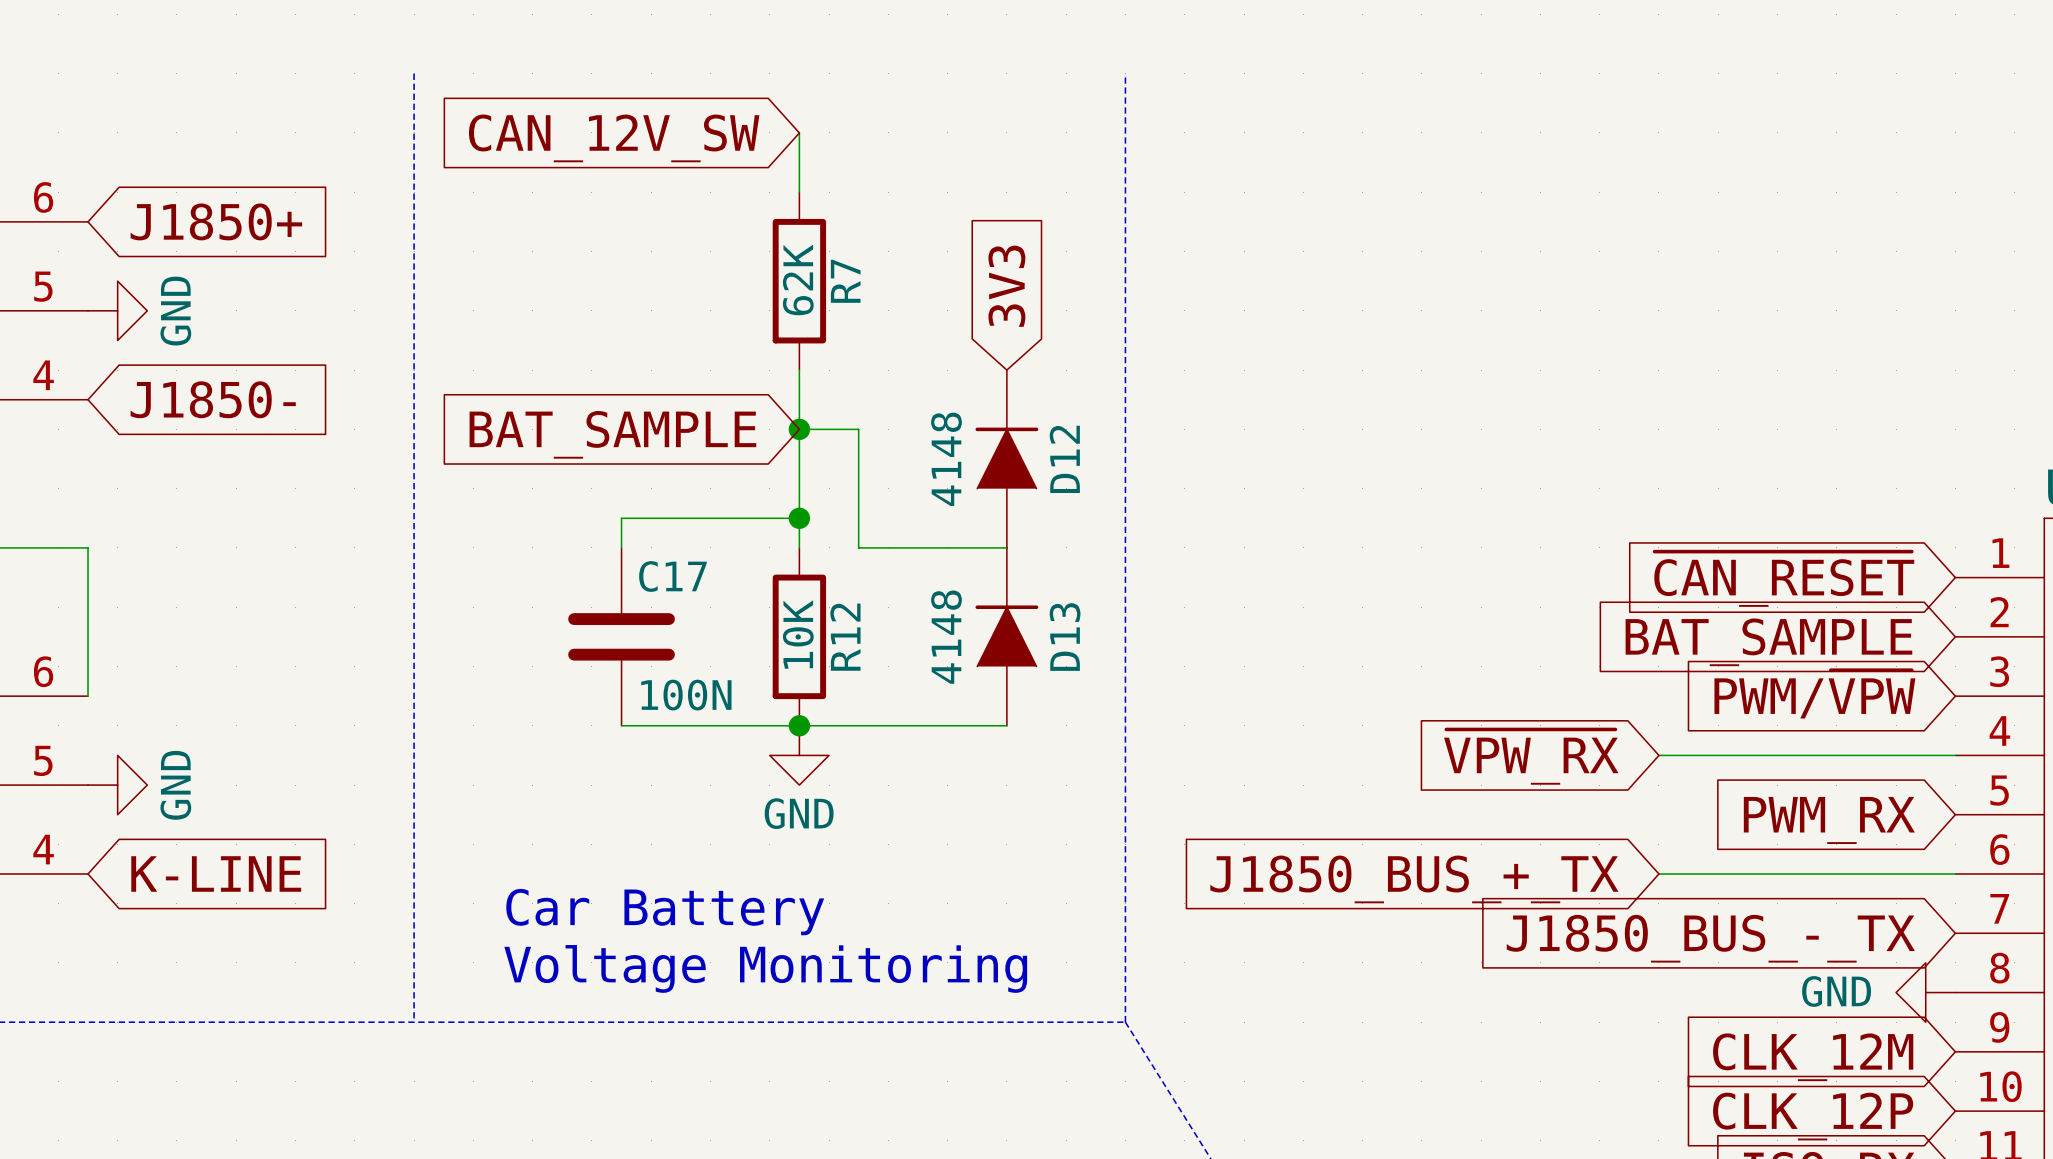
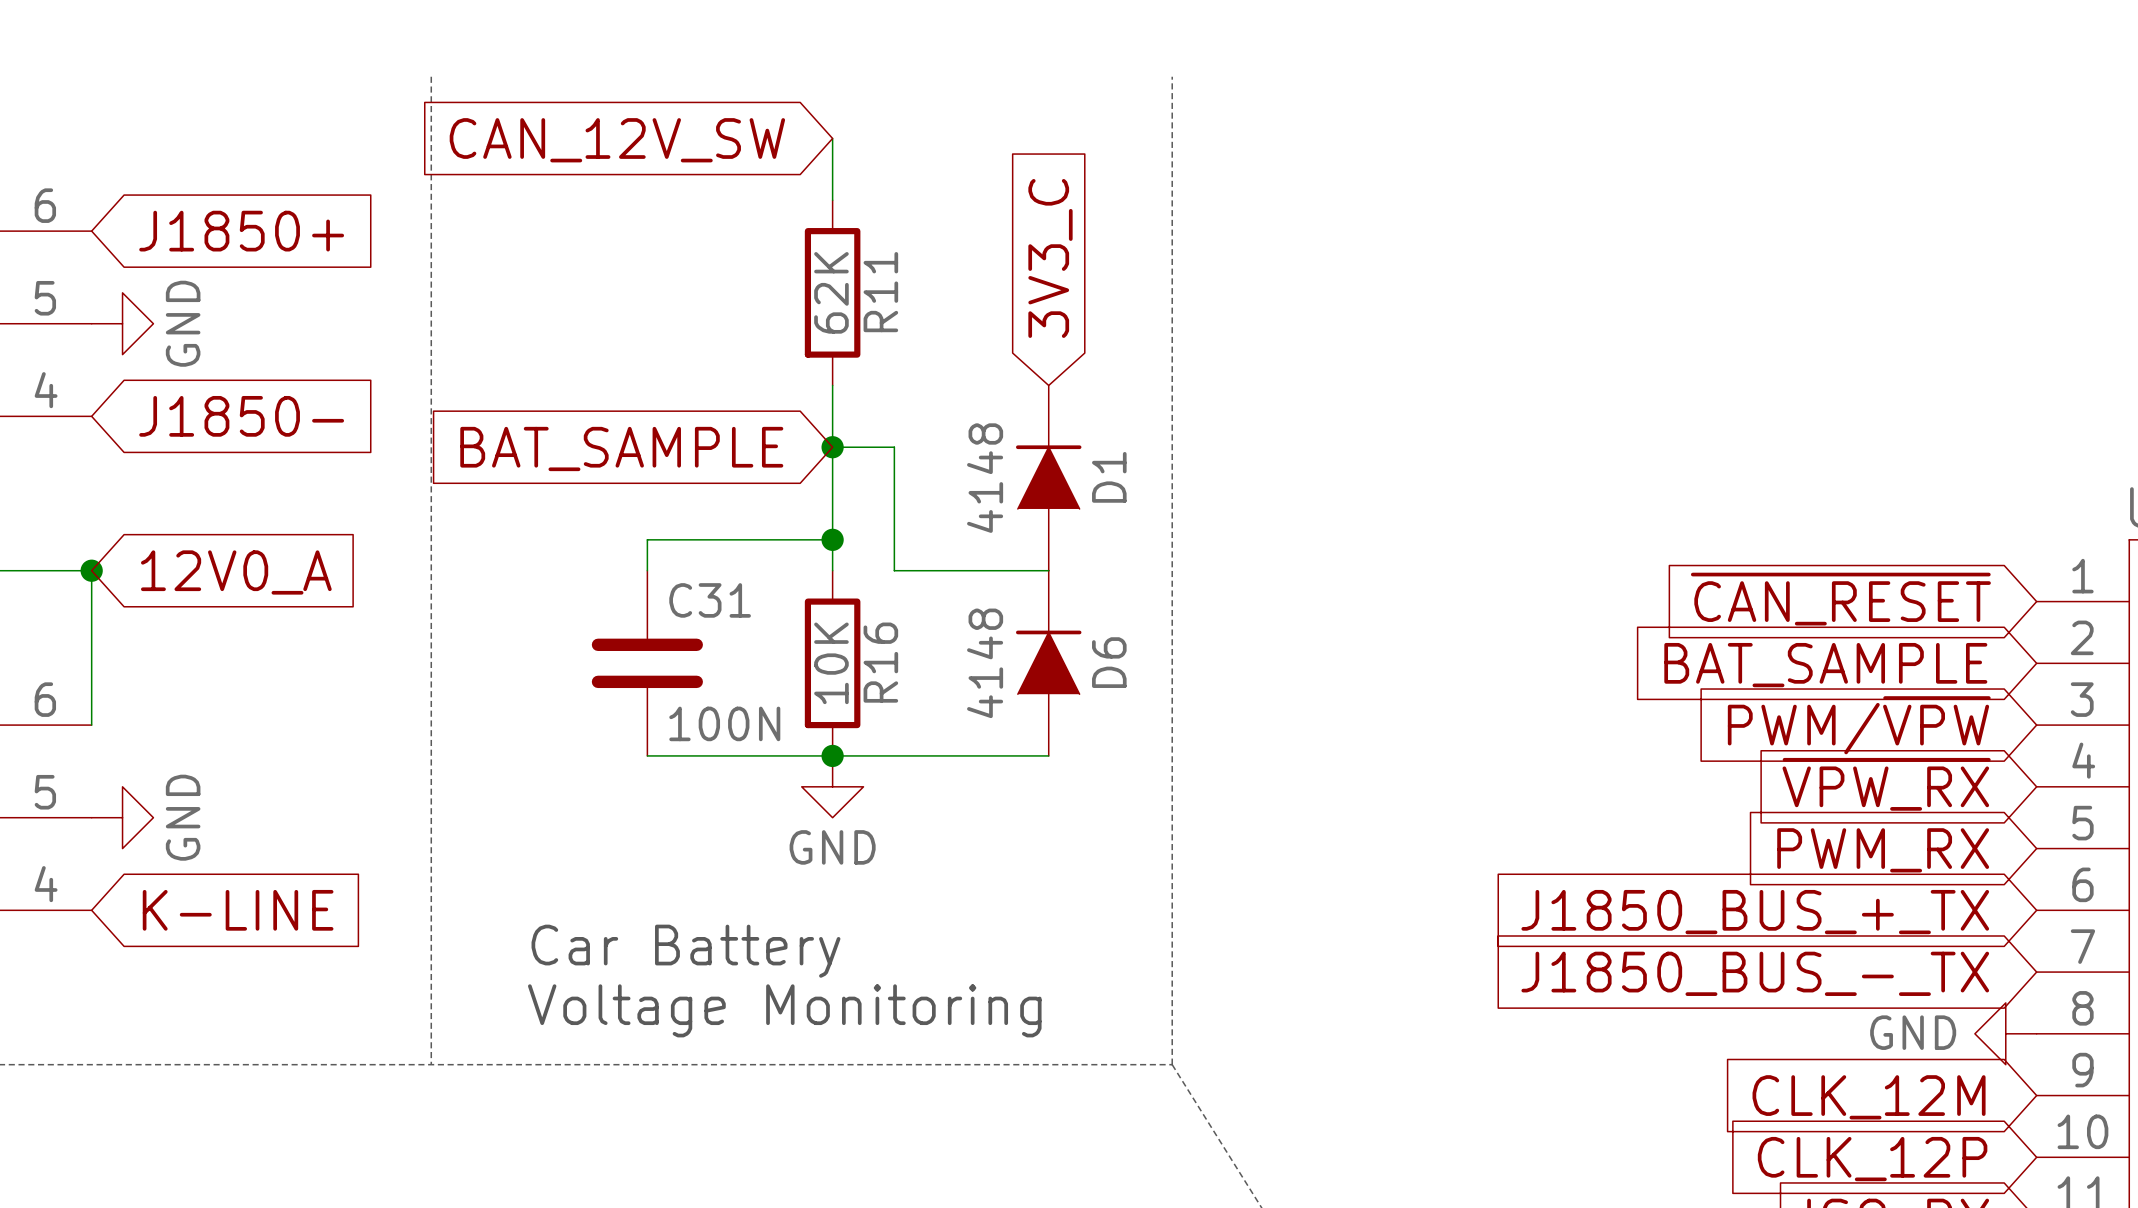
R7 name: R7 (845, 281) -> R11 (880, 292)
global label: 3V3 (1006, 286) -> 3V3_C (1050, 258)
D12 name: D12 (1064, 459) -> D1 (1109, 477)
junction: none -> (91, 570)
global label: none -> 12V0_A (236, 572)
C17 name: C17 (672, 576) -> C31 (710, 600)
R12 name: R12 (845, 637) -> R16 (880, 662)
D13 name: D13 (1065, 637) -> D6 (1109, 662)
wire: (1658, 755) (1955, 755) -> none
global label position: ~{VPW_RX} (1531, 757) -> ~{VPW_RX} (1886, 784)
wire: (1658, 873) (1955, 873) -> none
global label position: J1850_BUS_+_TX (1414, 879) -> J1850_BUS_+_TX (1755, 912)

